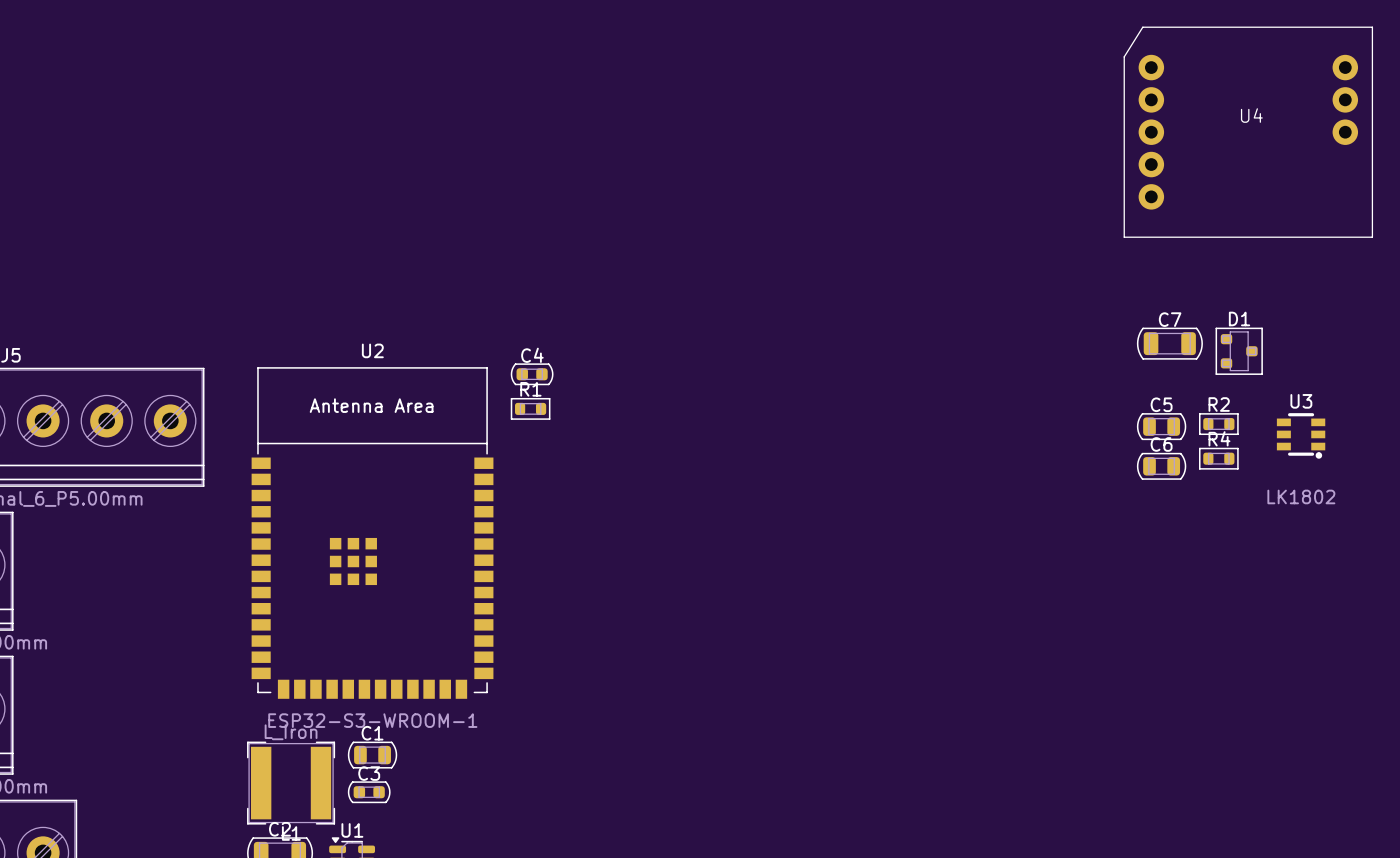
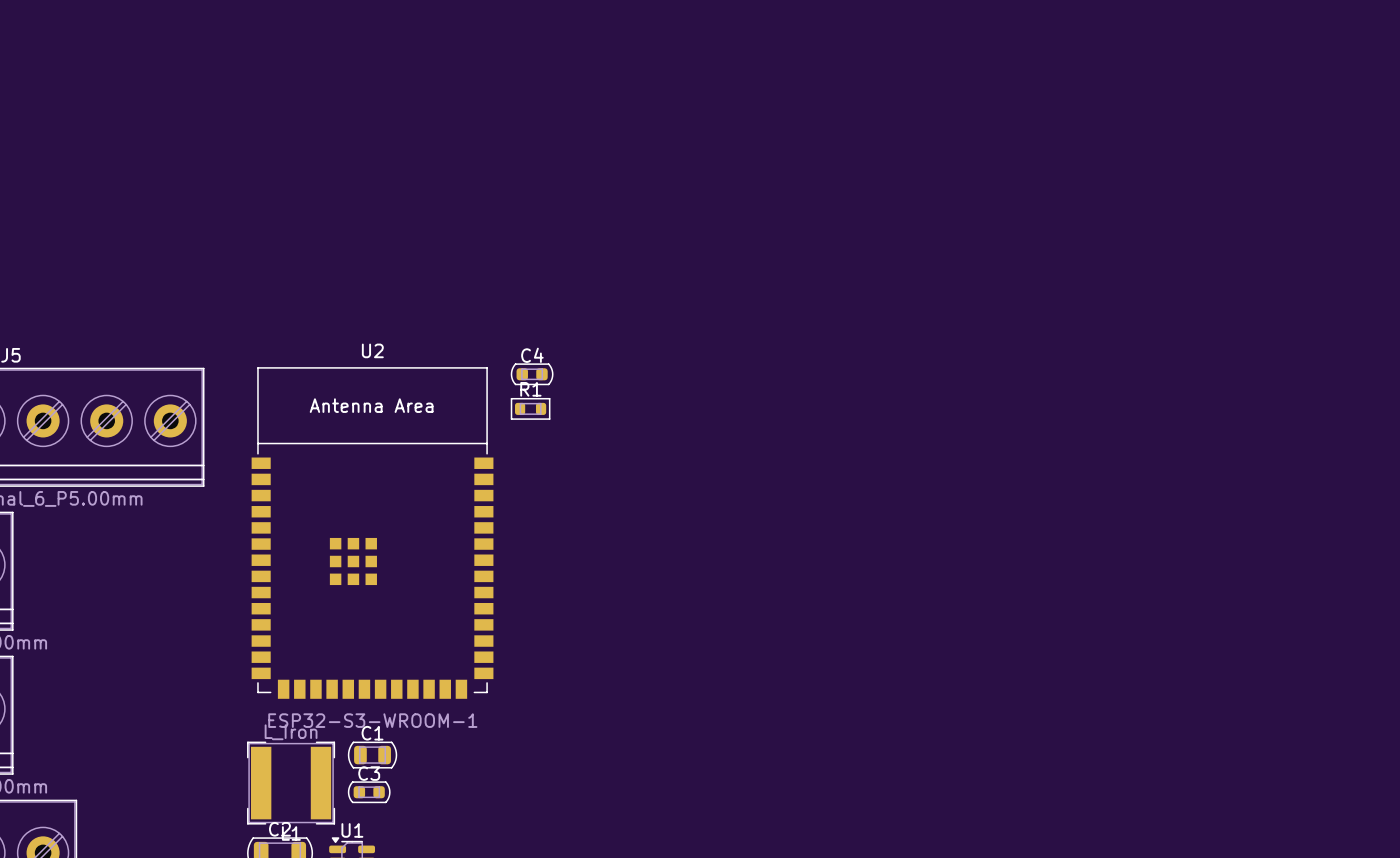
U4: (1248, 132) -> none
C7: (1169, 343) -> none
D1: (1239, 351) -> none
R2: (1218, 424) -> none
C5: (1161, 426) -> none
U3: LK1802 (1301, 435) -> none
R4: (1218, 458) -> none
C6: (1161, 466) -> none

